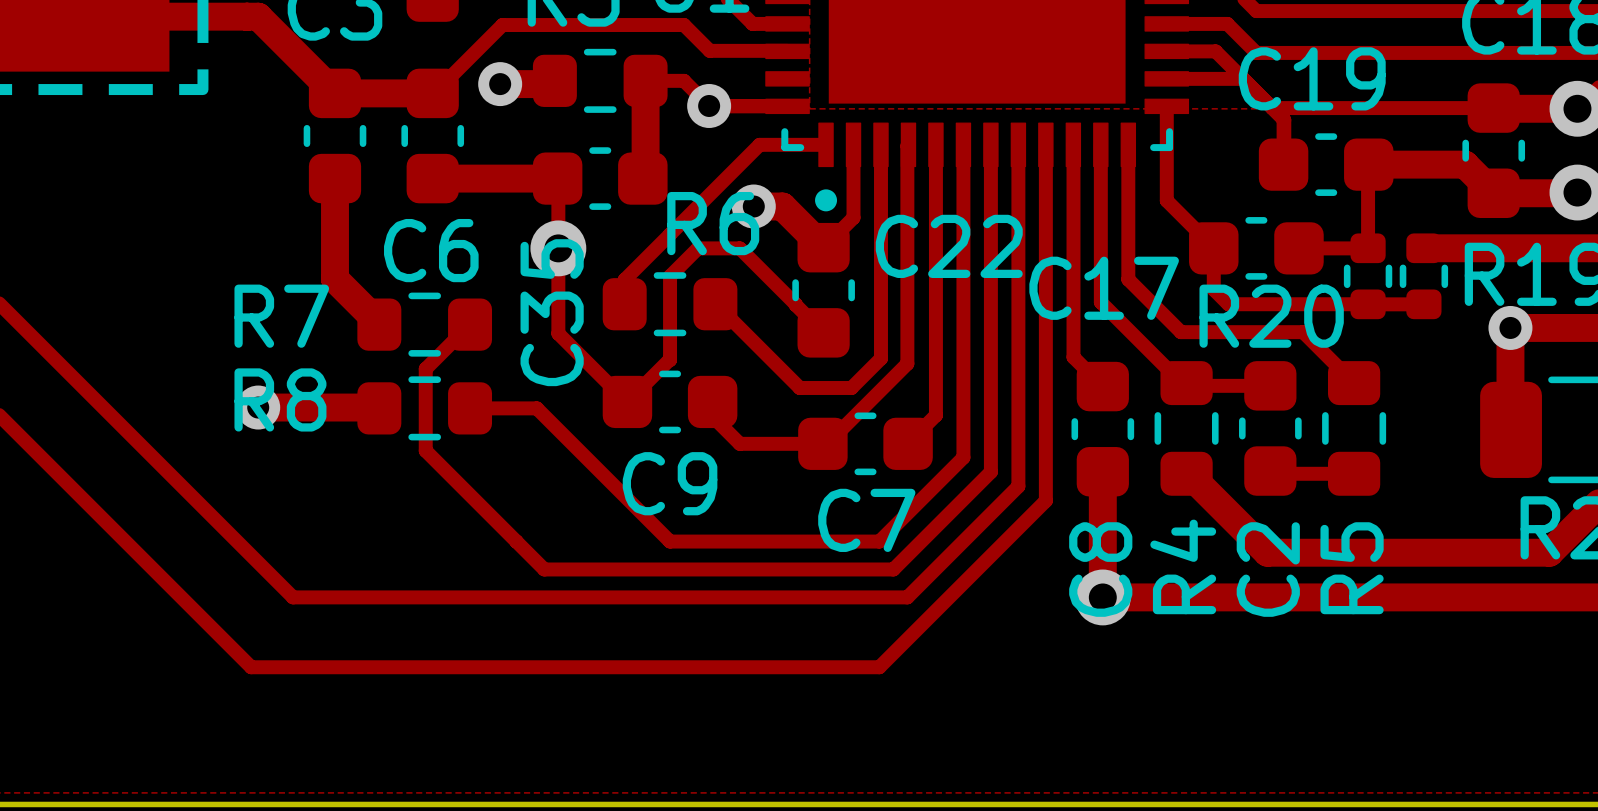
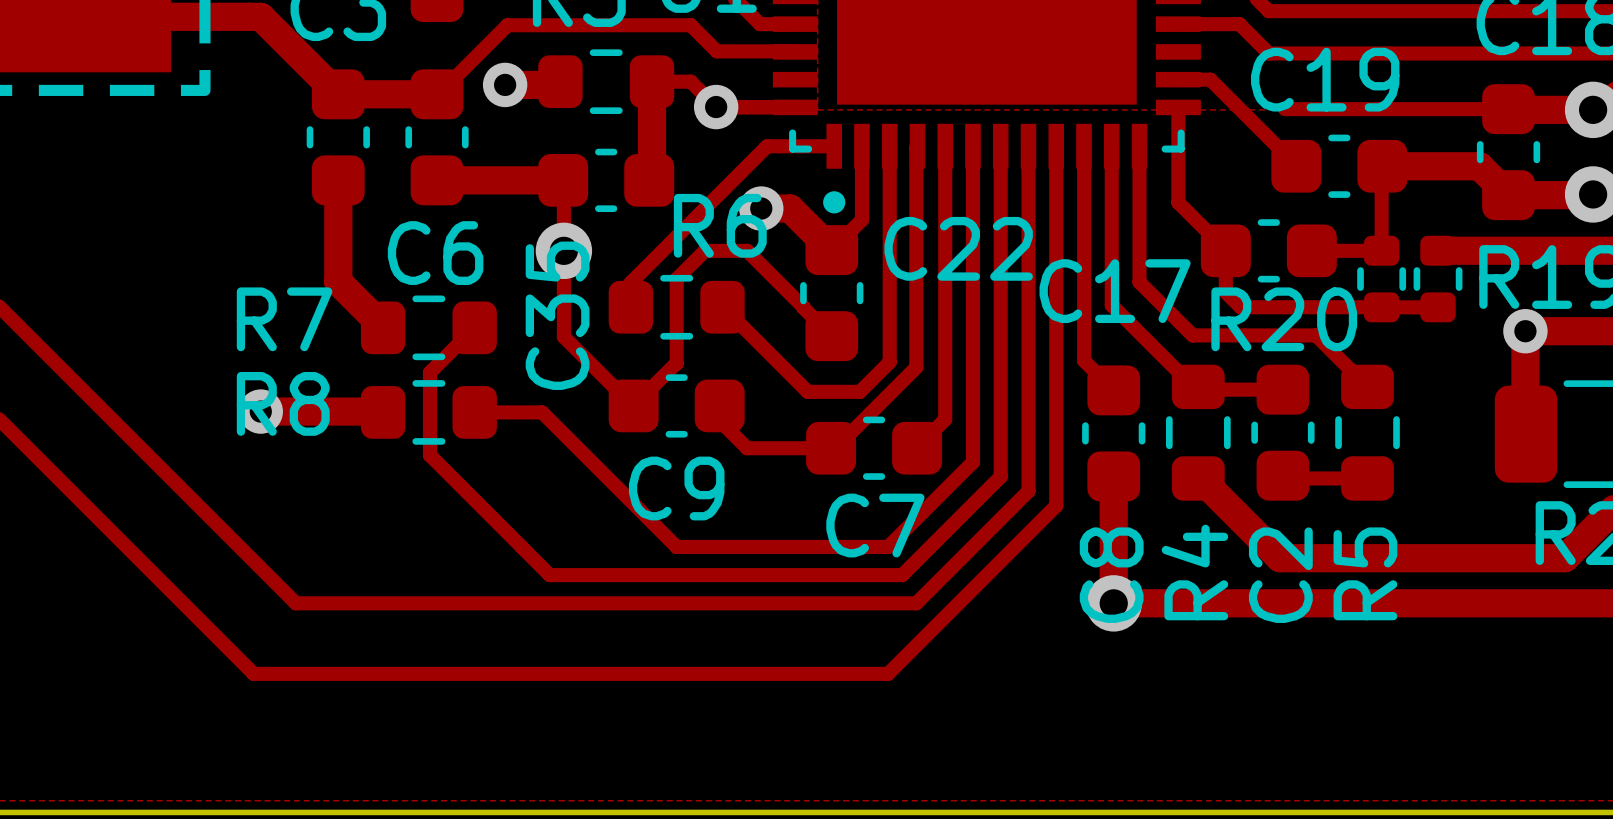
track: (1166, 51) (1215, 51) (1284, 120) (1284, 163) -> (1210, 79) (1297, 166)
track: (1198, 78) (1243, 78) -> none

